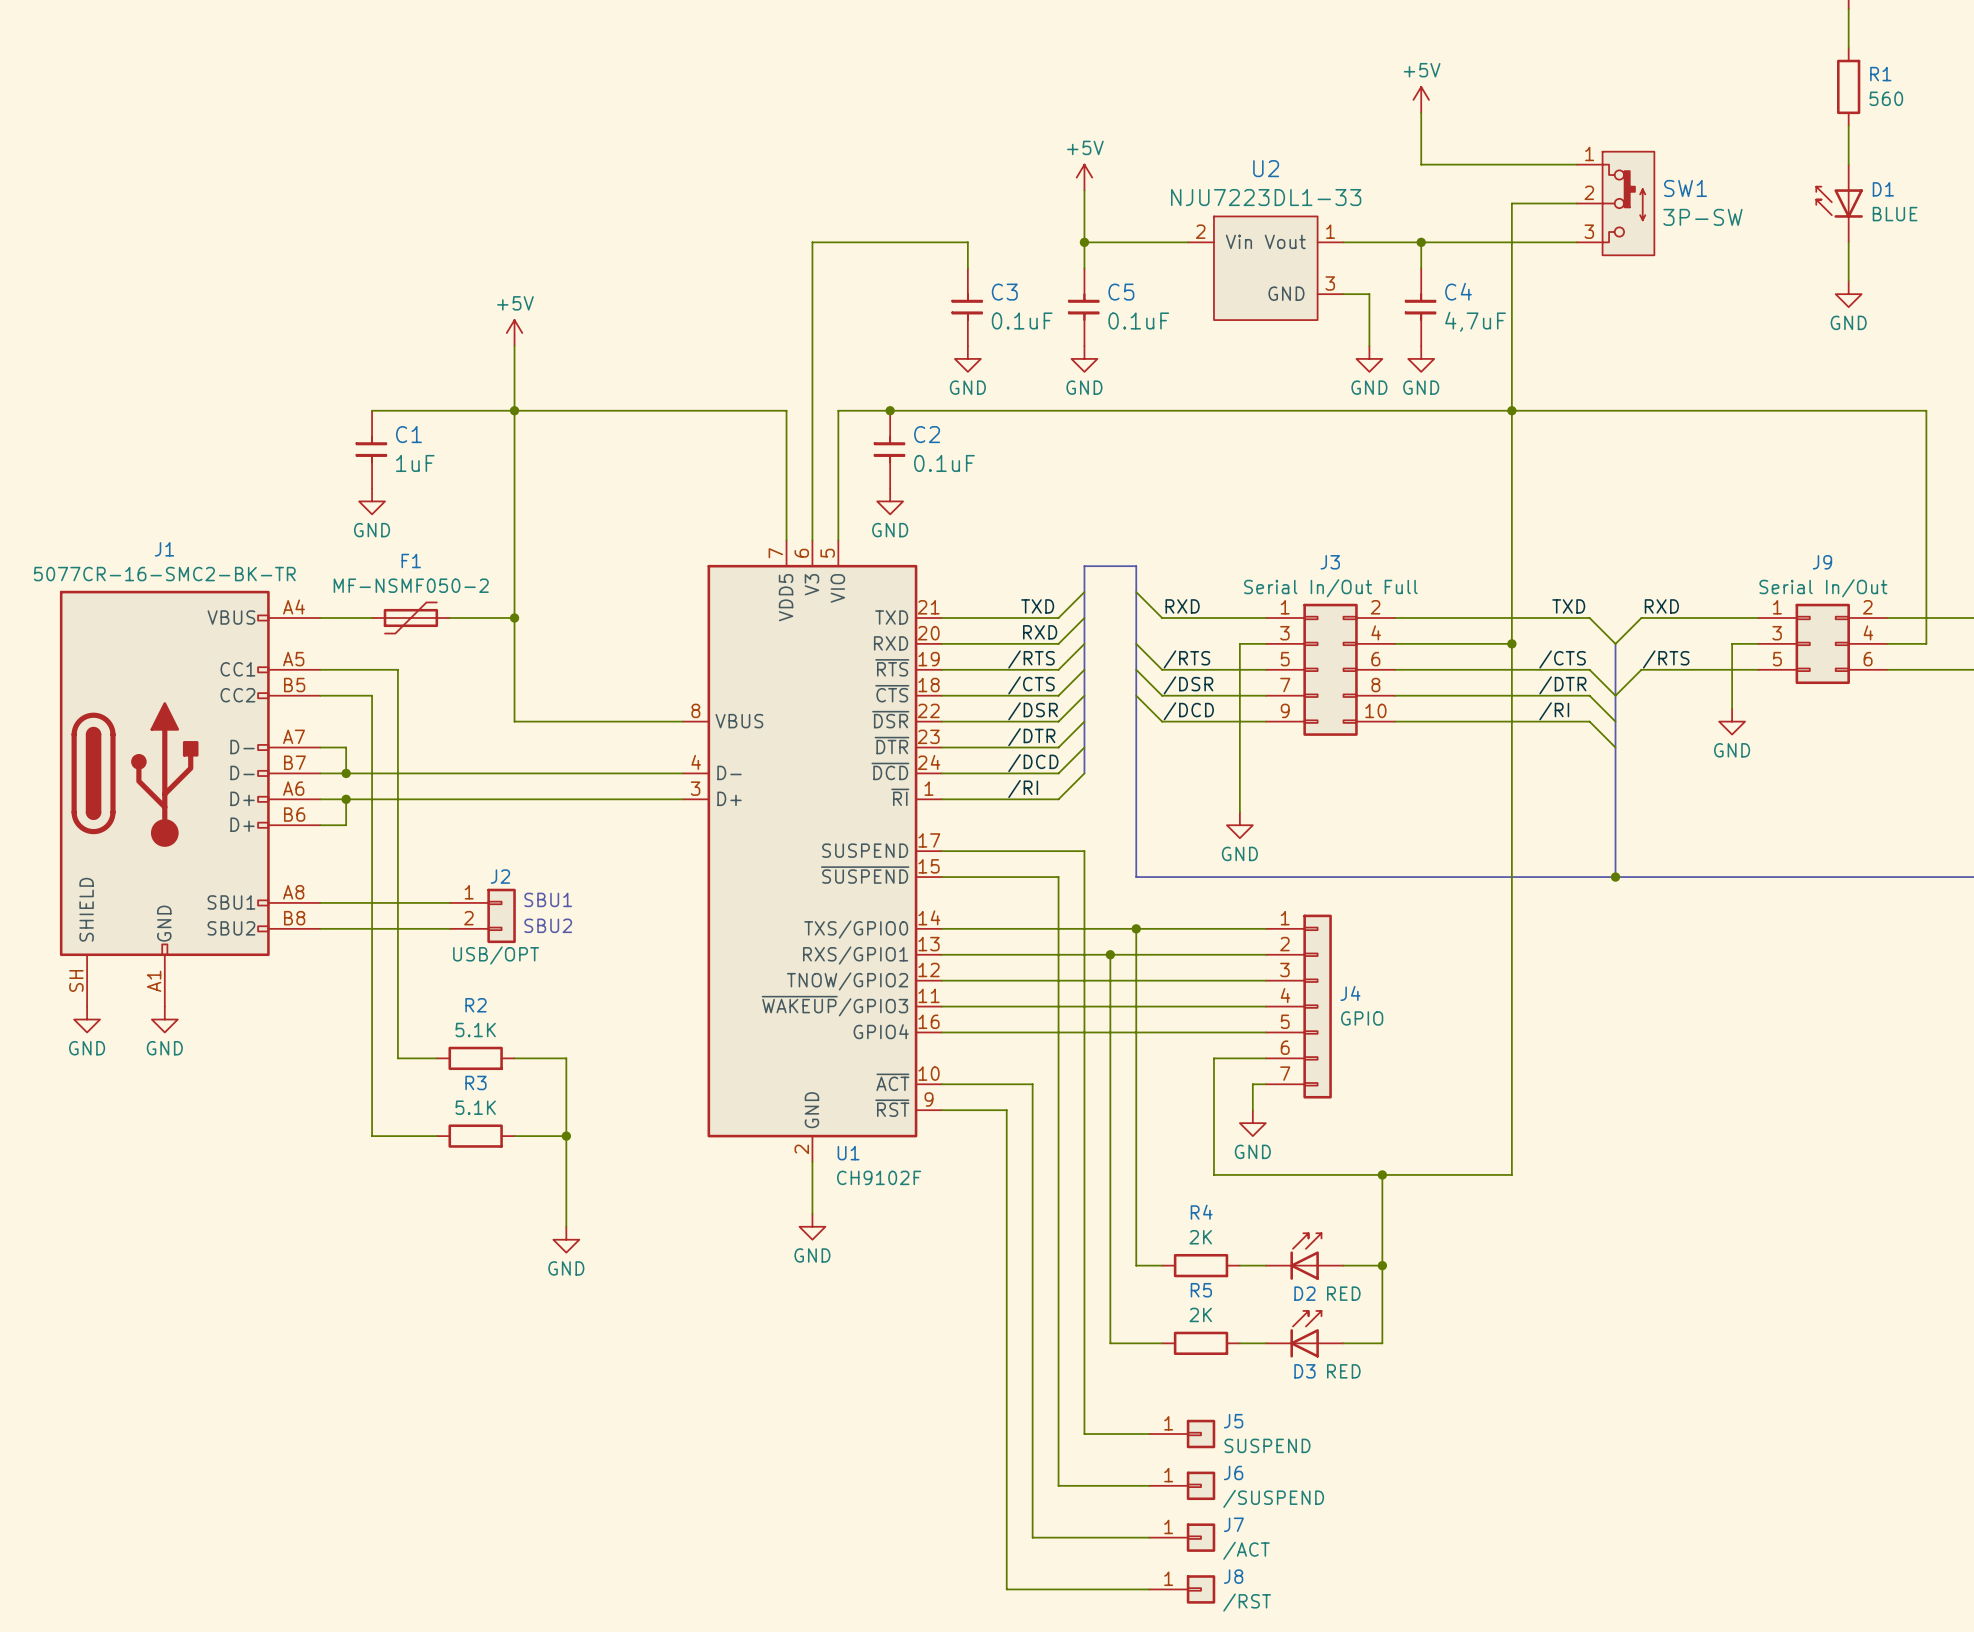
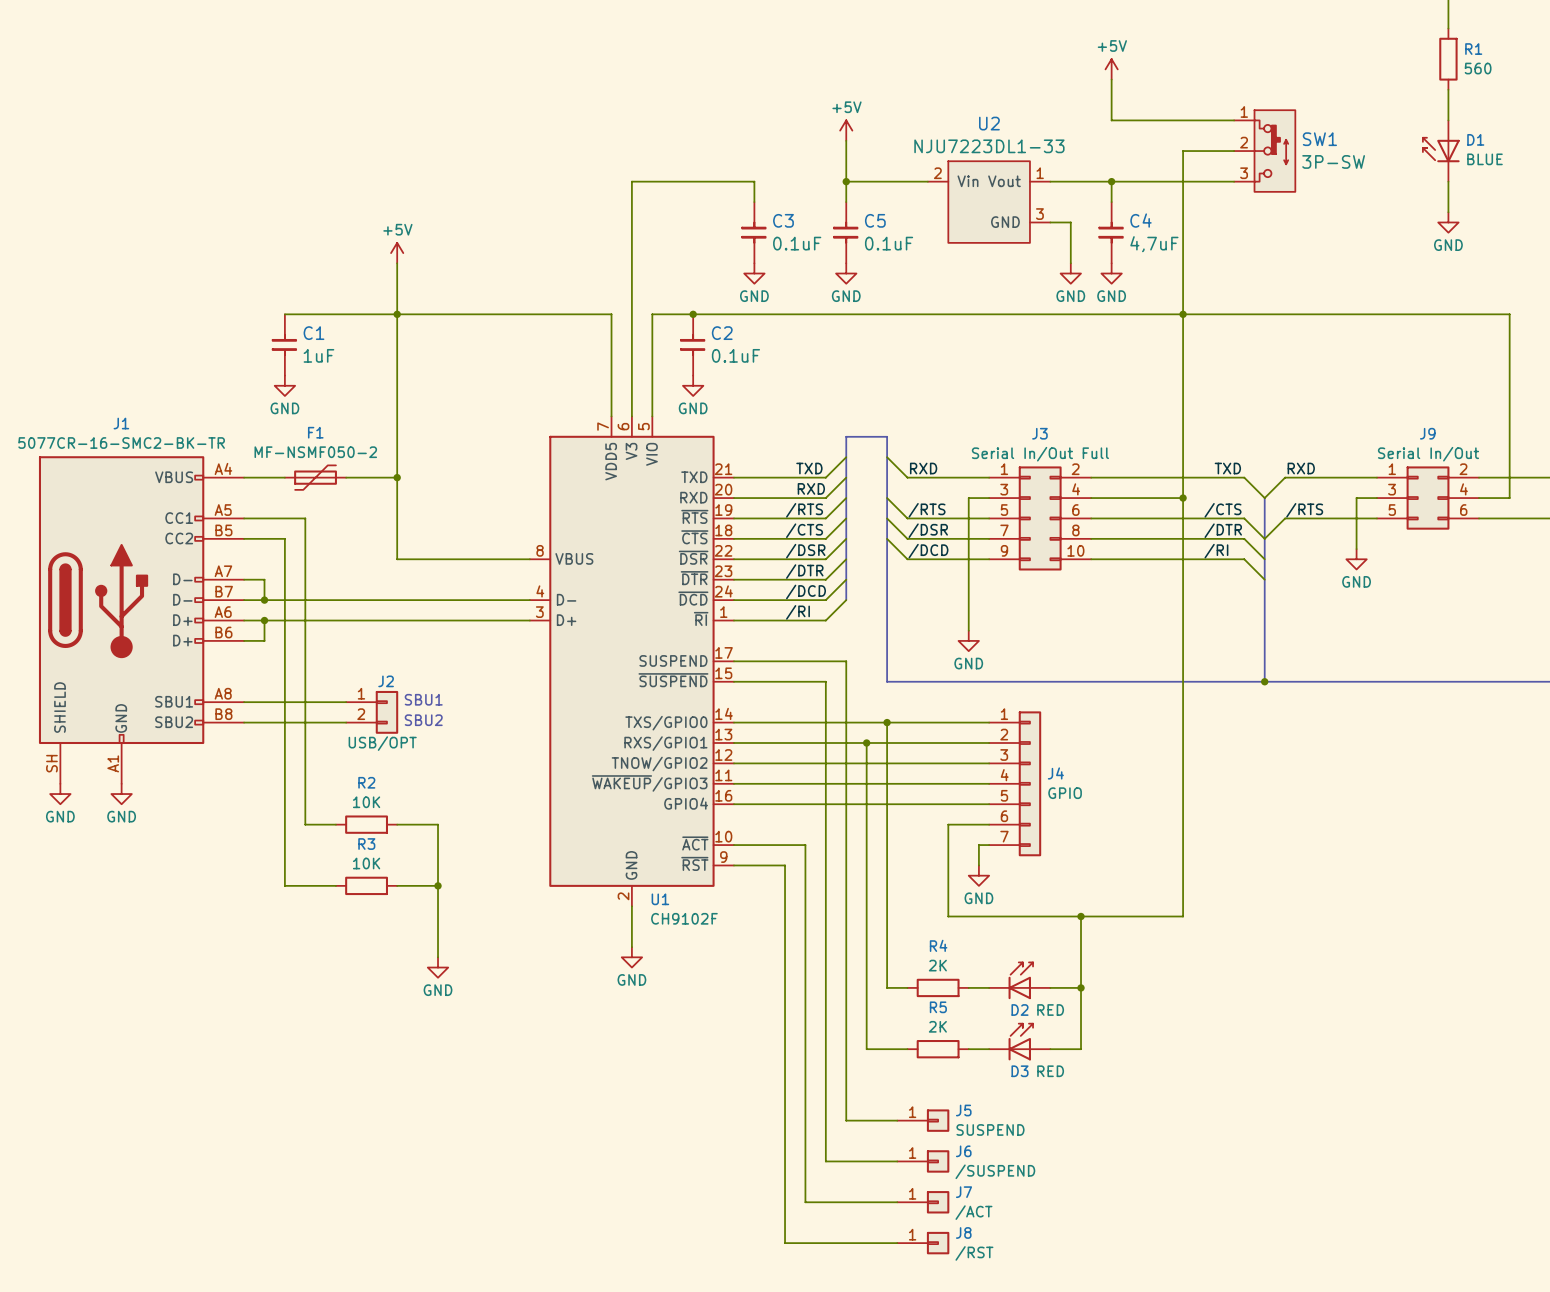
R2 value: 5.1K (475, 1029) -> 10K (366, 802)
R3 value: 5.1K (475, 1107) -> 10K (366, 863)

